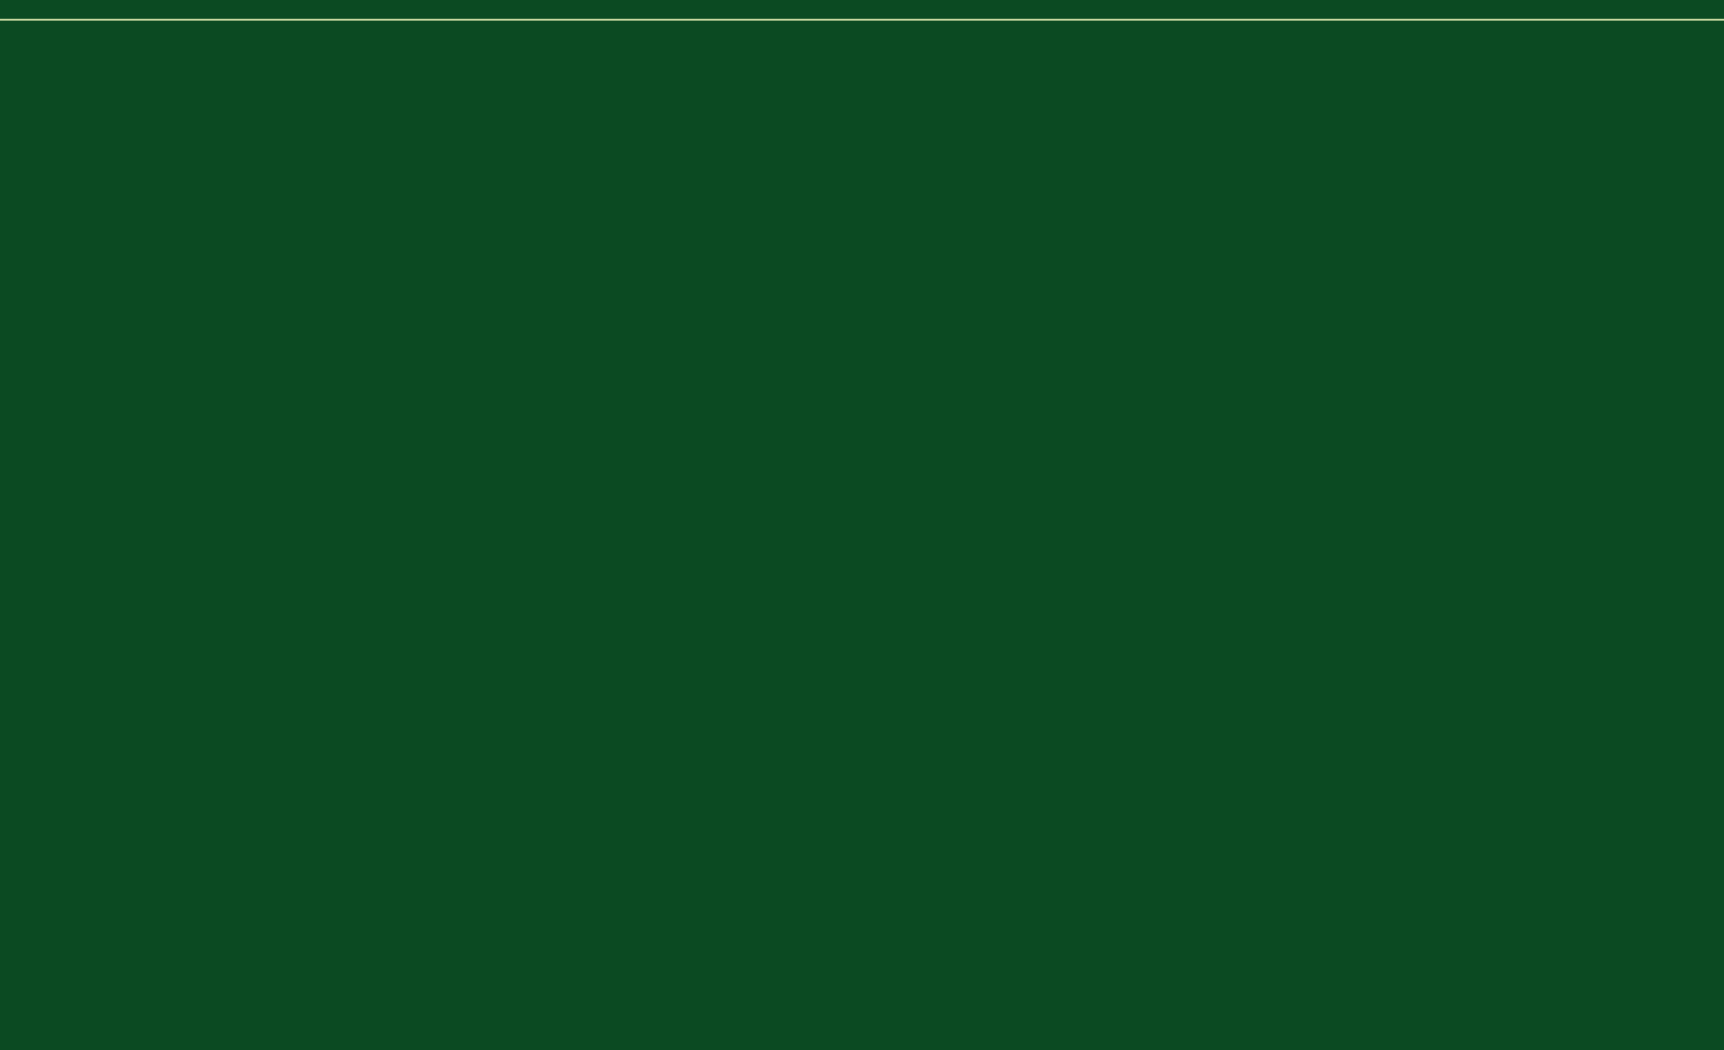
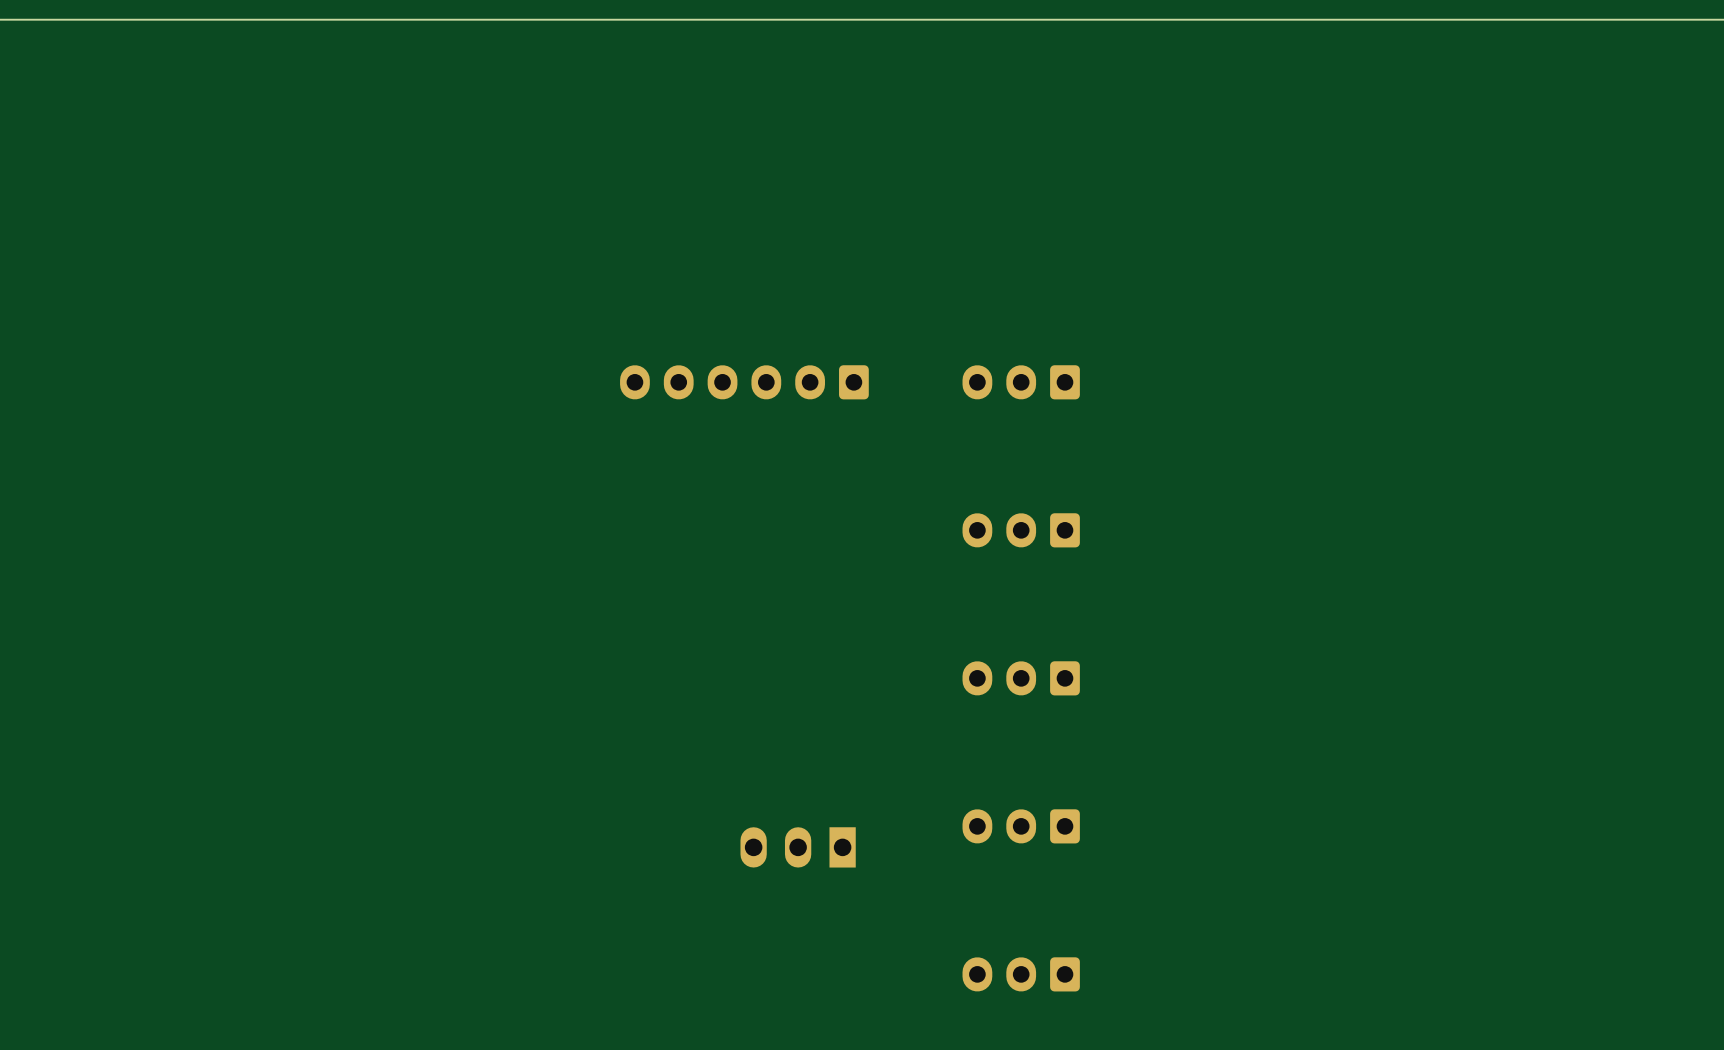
part: none -> (744, 382)
part: none -> (1021, 382)
part: none -> (1021, 530)
part: none -> (1021, 678)
part: none -> (1021, 826)
part: none -> (798, 847)
part: none -> (1021, 974)

